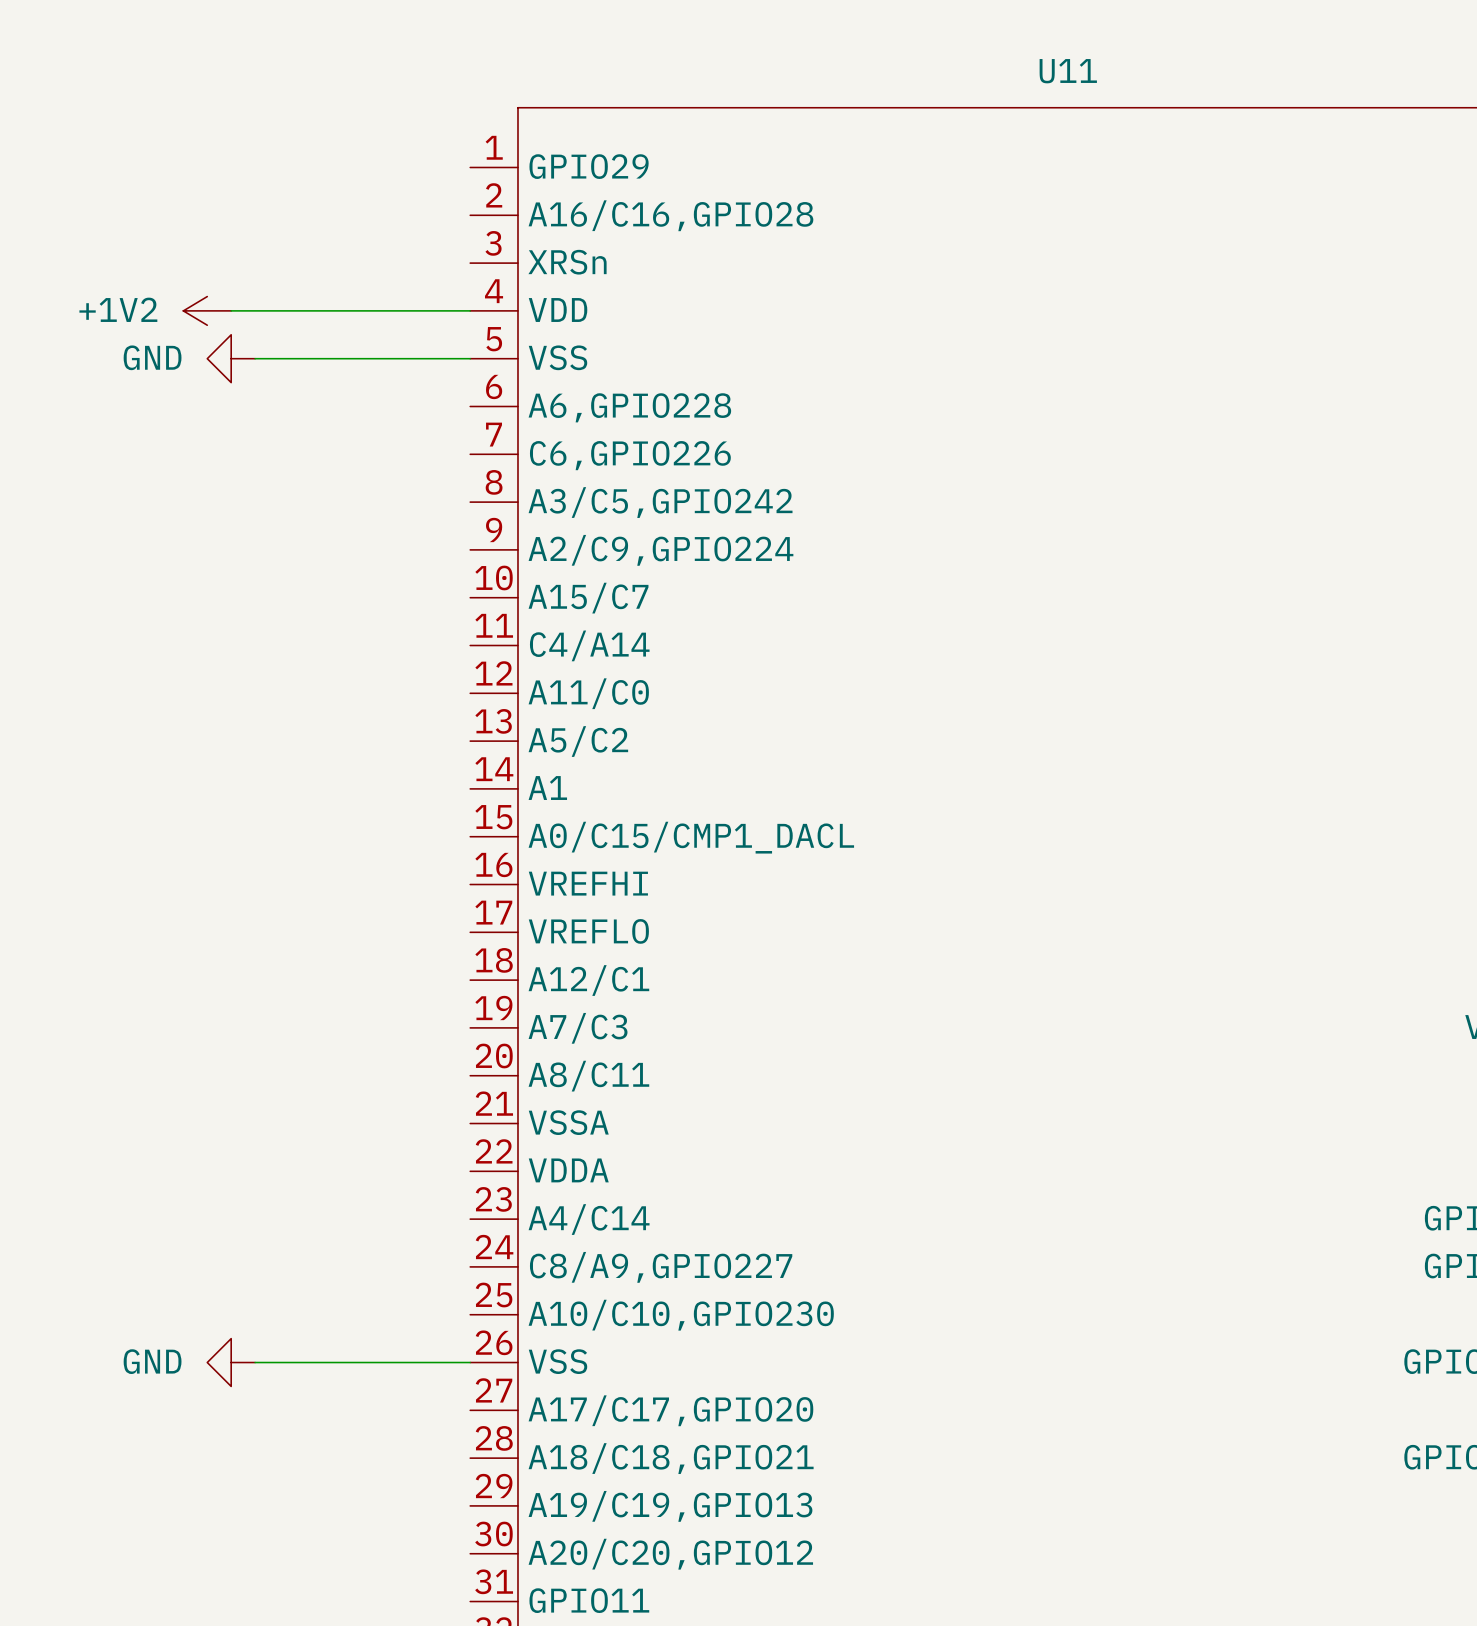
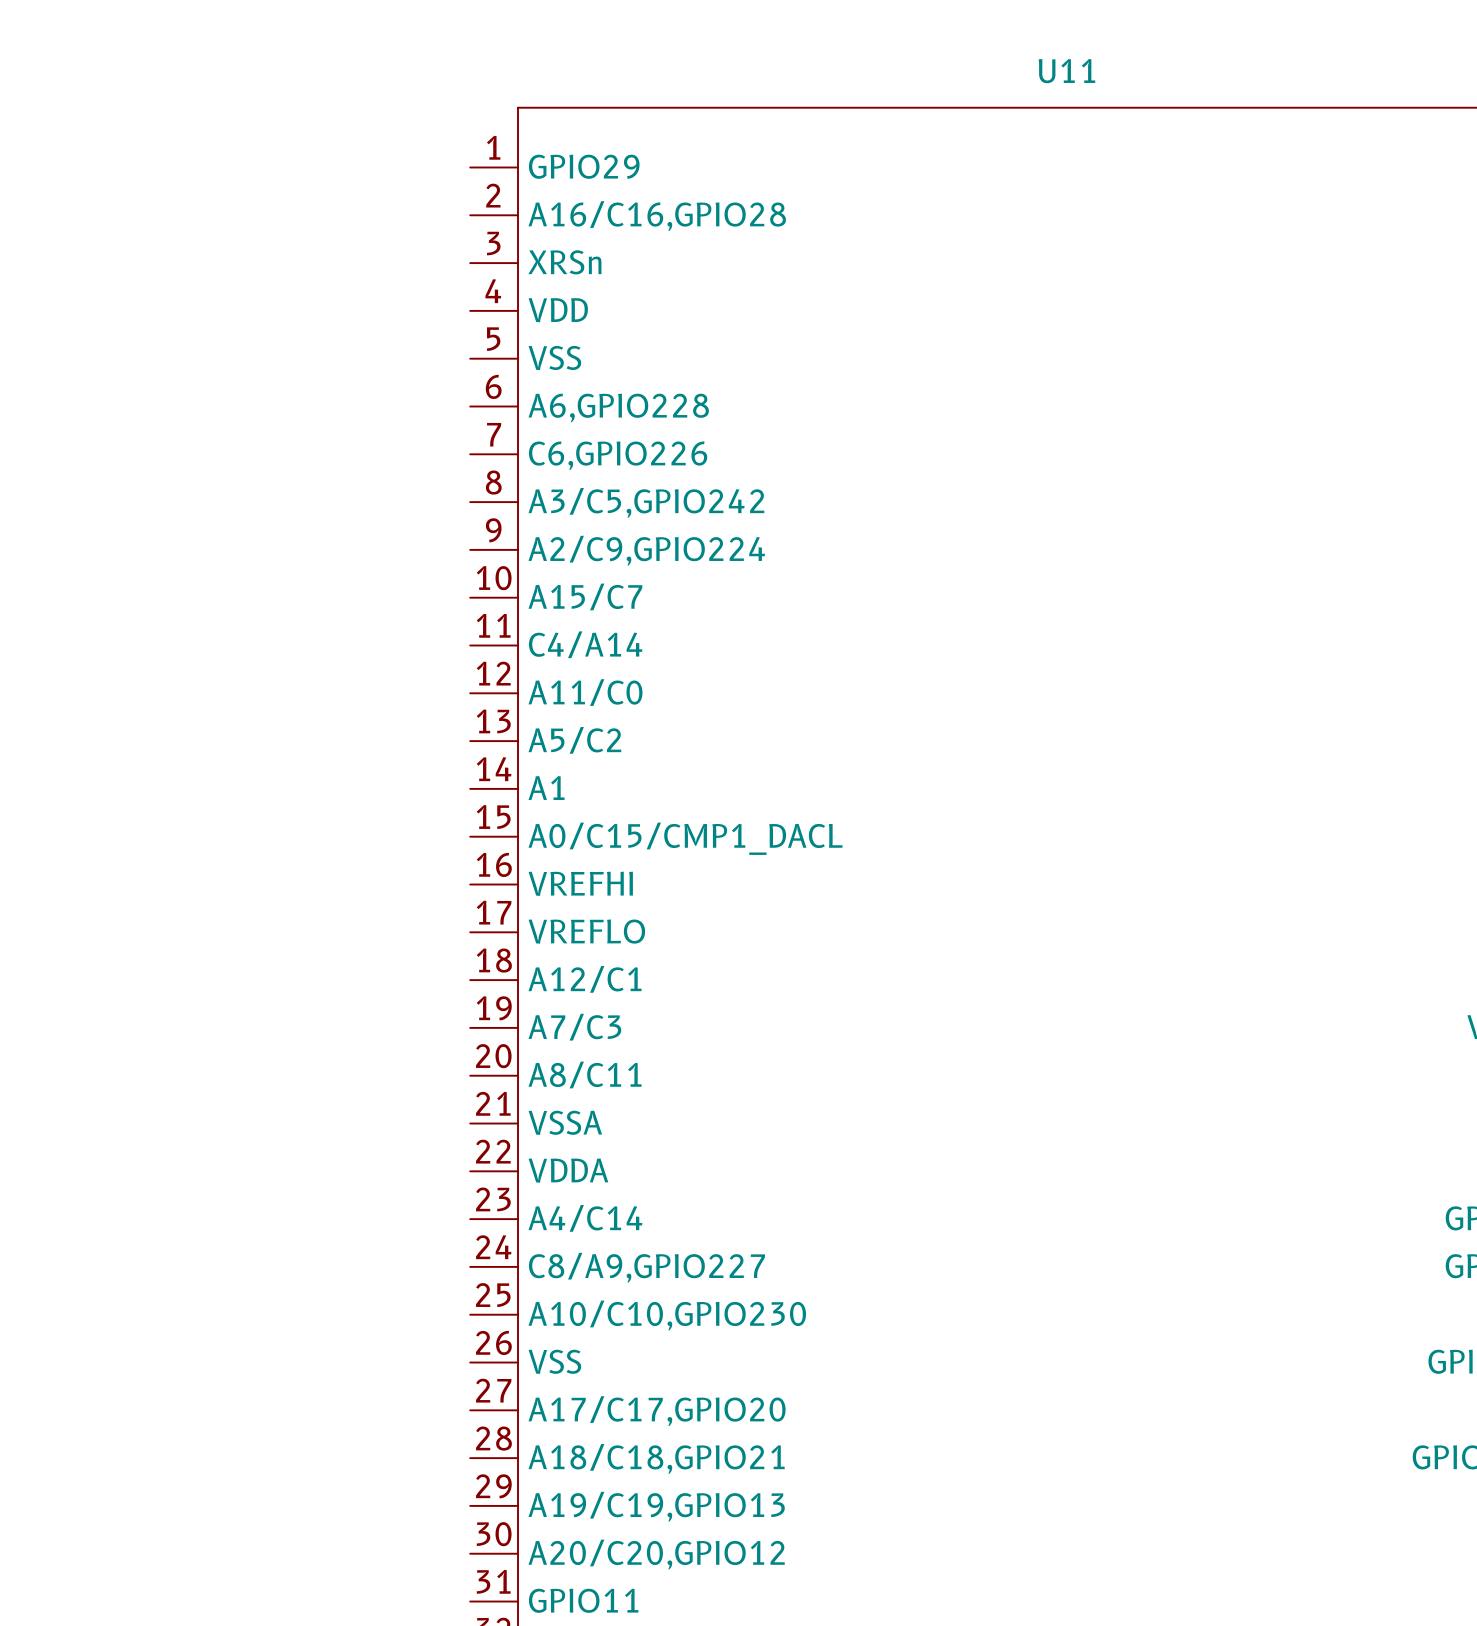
power symbol: +1V2 (207, 310) -> none
wire: (231, 310) (470, 310) -> none
power symbol: GND (231, 358) -> none
wire: (255, 358) (470, 358) -> none
power symbol: GND (231, 1362) -> none
wire: (255, 1362) (470, 1362) -> none

